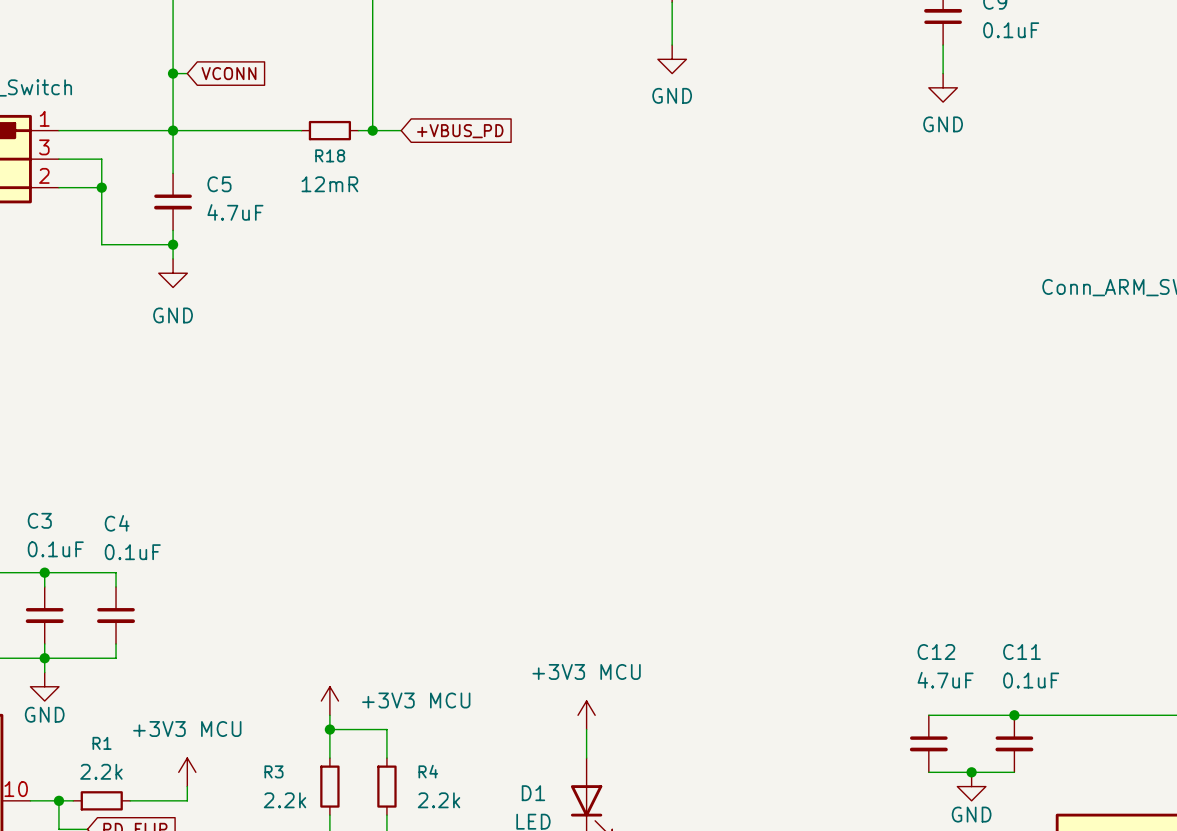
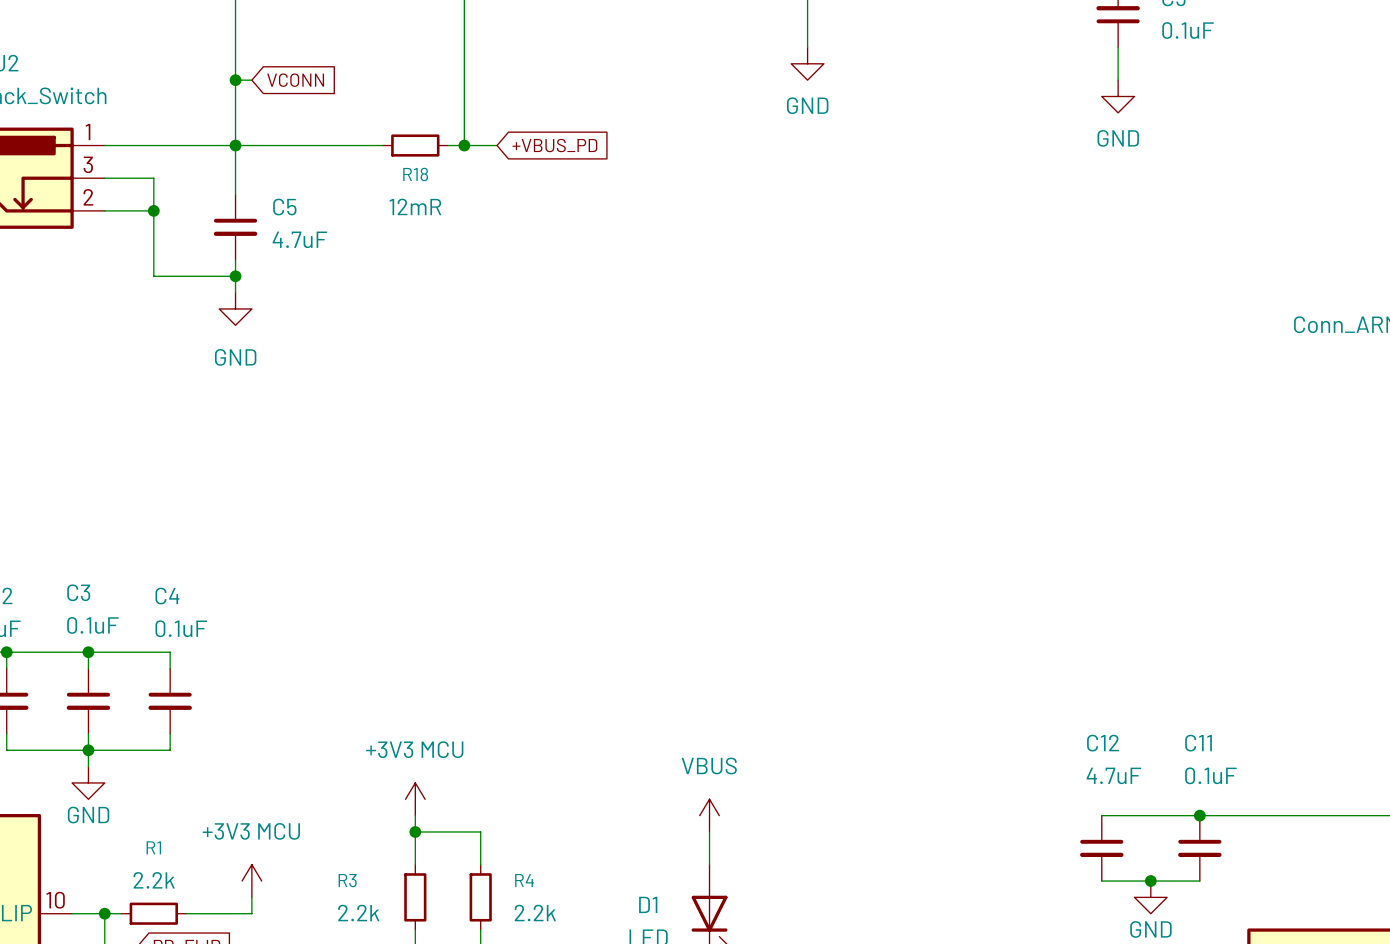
power symbol text position: +3V3 MCU (416, 700) -> +3V3 MCU (414, 749)
power symbol: +3V3 MCU (586, 715) -> VBUS (709, 815)

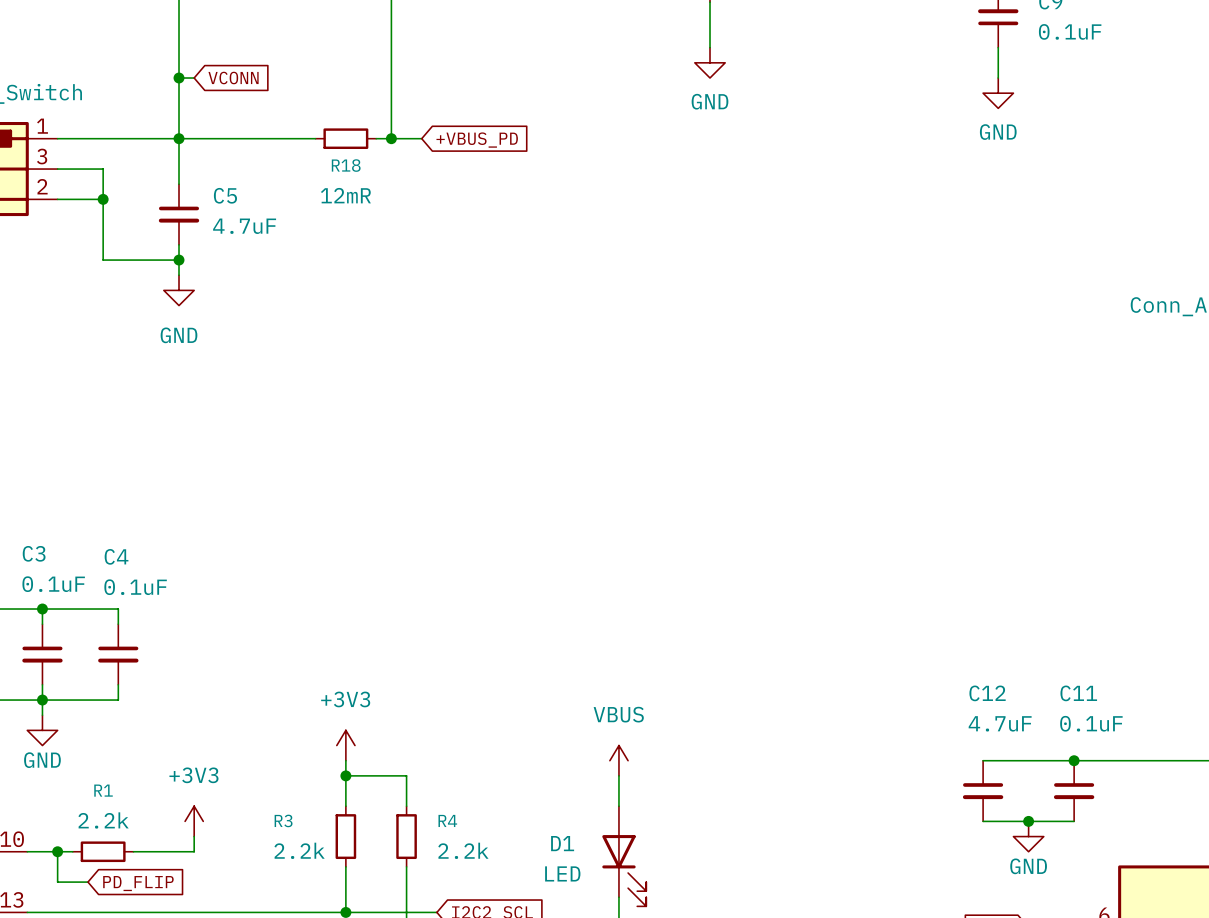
power symbol: +3V3 MCU (415, 799) -> +3V3 (345, 745)
power symbol: +3V3 MCU (251, 881) -> +3V3 (194, 821)

